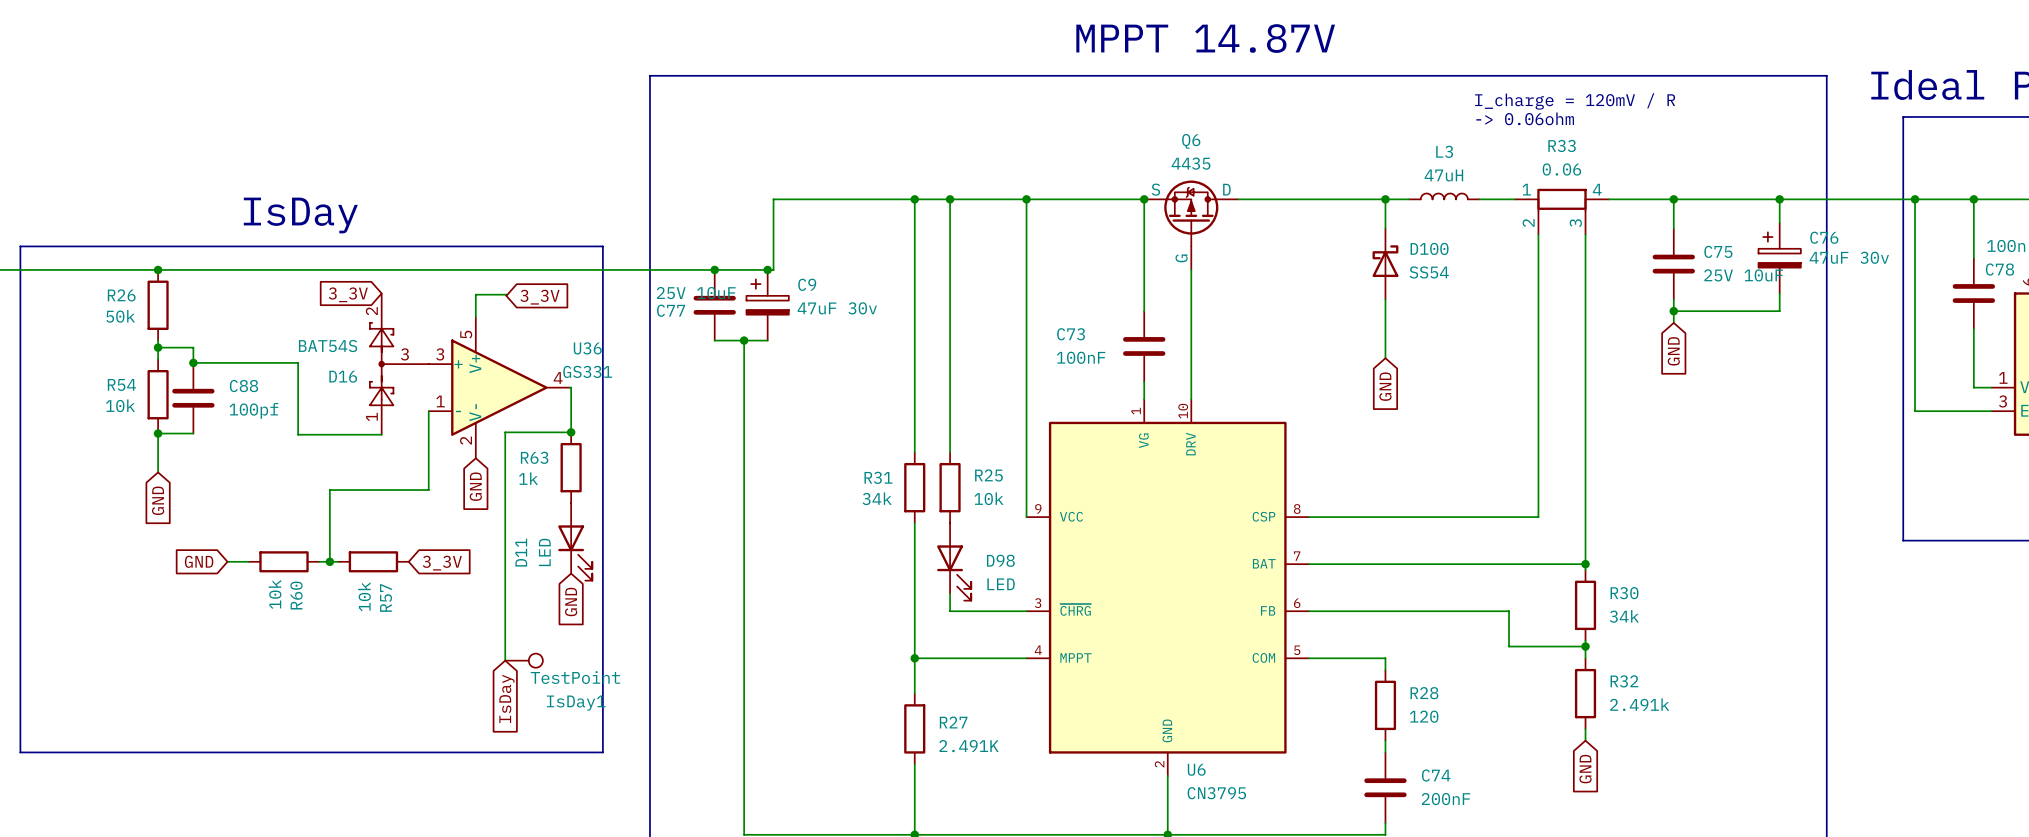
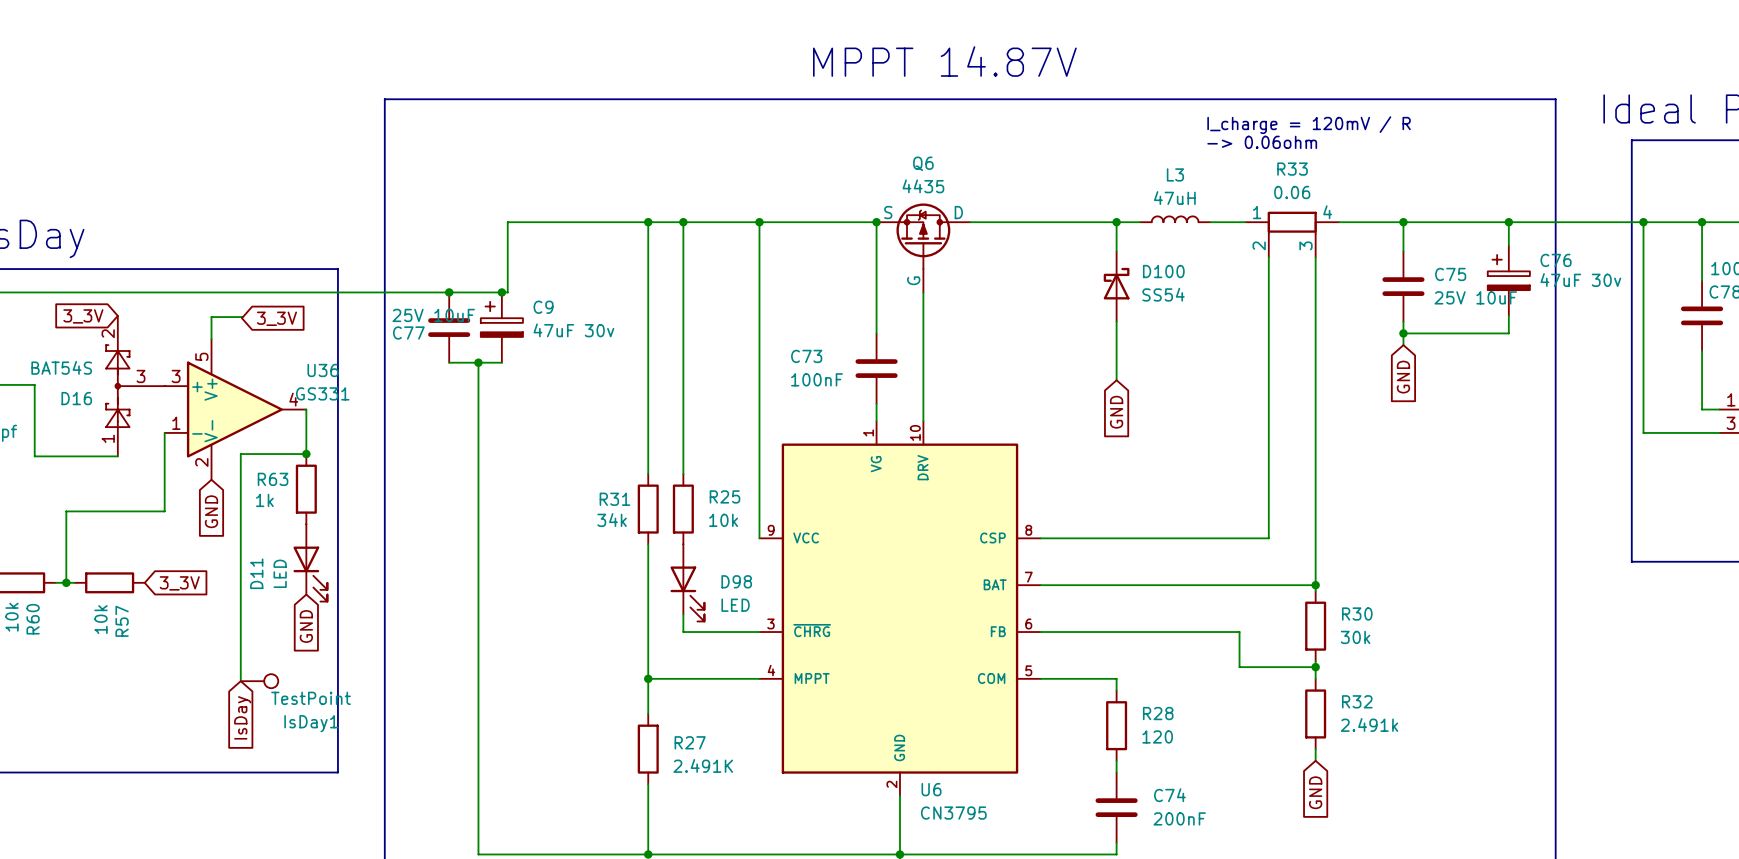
R30 value: 34k (1624, 616) -> 30k (1355, 637)

